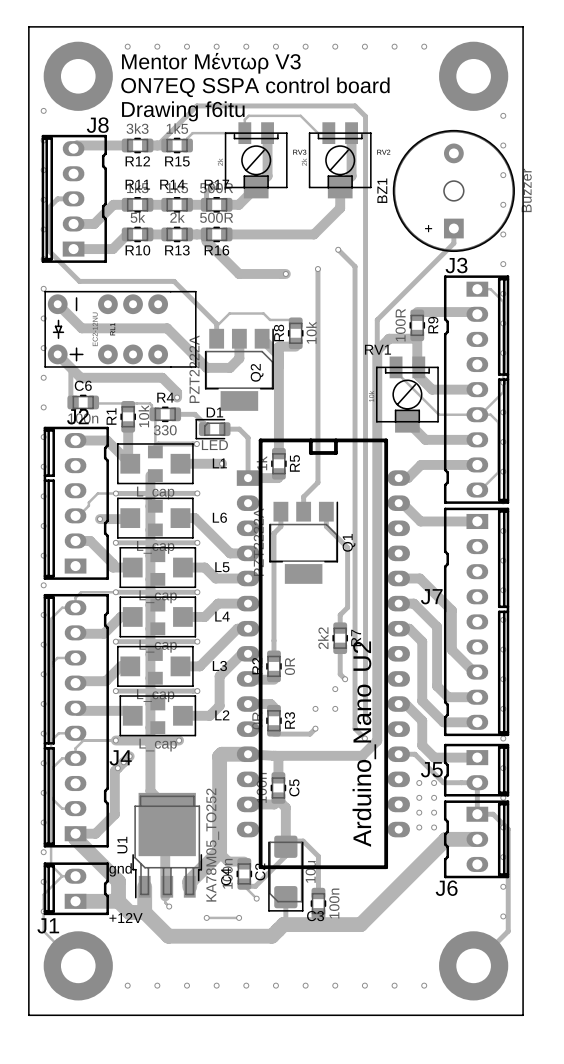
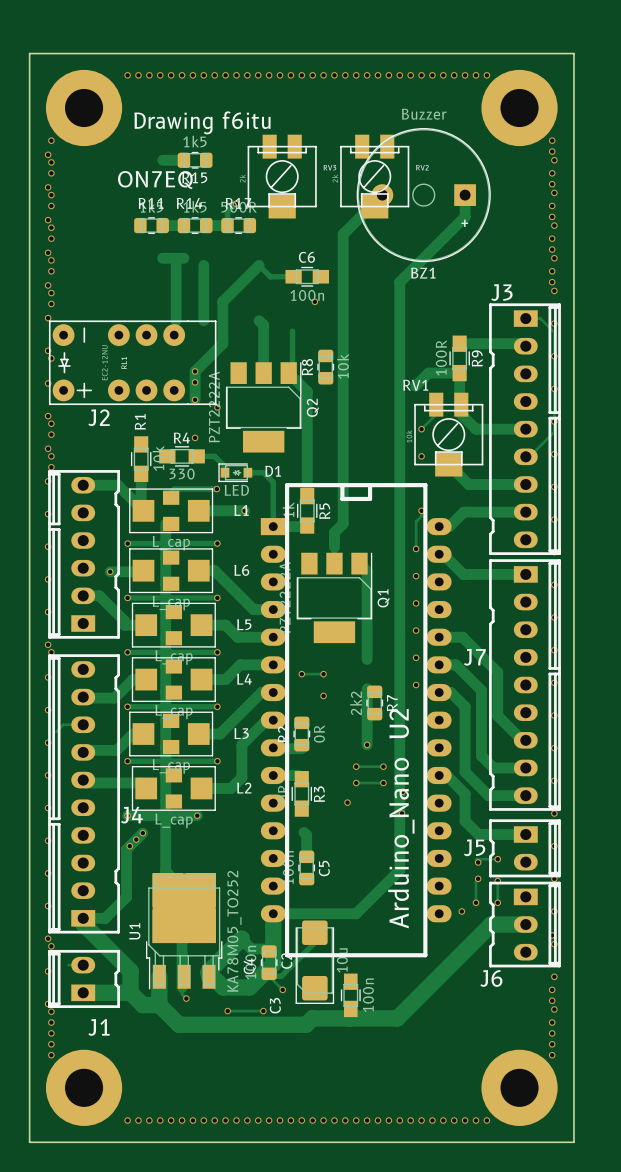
board edge: (28, 26) (28, 1015) (523, 1015) (523, 26) (28, 26) -> (29, 53) (29, 1142) (573, 1142) (573, 53) (29, 53)
via: (127, 46) -> none
via: (157, 46) -> none
via: (187, 46) -> none
via: (216, 46) -> none
via: (246, 46) -> none
via: (275, 46) -> none
via: (305, 46) -> none
via: (335, 46) -> none
via: (364, 46) -> none
via: (394, 46) -> none
via: (424, 46) -> none
text: Mentor Μέντωρ V3 (211, 63) -> none
via: none -> (127, 75)
via: none -> (138, 75)
via: none -> (149, 75)
via: none -> (160, 75)
via: none -> (171, 75)
via: none -> (182, 75)
via: none -> (192, 75)
via: none -> (203, 75)
via: none -> (214, 75)
via: none -> (225, 75)
via: none -> (236, 75)
via: none -> (247, 75)
via: none -> (258, 75)
via: none -> (269, 75)
via: none -> (280, 75)
via: none -> (290, 75)
via: none -> (301, 75)
via: none -> (312, 75)
via: none -> (323, 75)
via: none -> (334, 75)
via: none -> (345, 75)
via: none -> (356, 75)
via: none -> (367, 75)
via: none -> (378, 75)
via: none -> (388, 75)
via: none -> (399, 75)
via: none -> (410, 75)
via: none -> (421, 75)
via: none -> (432, 75)
via: none -> (443, 75)
via: none -> (454, 75)
via: none -> (465, 75)
via: none -> (475, 75)
via: none -> (486, 75)
part position: (78, 76) -> (84, 108)
part position: (473, 76) -> (519, 108)
text: ON7EQ SSPA control board (255, 87) -> none
via position: (43, 110) -> (51, 140)
via: (503, 115) -> none
via: none -> (552, 140)
track: (267, 133) (267, 176) (238, 204) (226, 204) -> none
track: (328, 133) (317, 133) (300, 115) (248, 115) (244, 119) (244, 133) (192, 133) (187, 138) (187, 145) -> none
track: (351, 133) (351, 176) (340, 187) (340, 208) (314, 234) (226, 234) -> none
via: none -> (552, 151)
track: (127, 145) (76, 145) (73, 148) -> none
R12: 3k3 (137, 145) -> none
track: (157, 145) (196, 105) (355, 105) (365, 116) (365, 718) -> none
via: none -> (51, 162)
via: none -> (51, 173)
via: none -> (552, 173)
text: none -> ON7EQ (155, 179)
via: none -> (552, 184)
via: none -> (51, 195)
track: none -> (465, 195) (465, 216) (399, 282) (399, 870) (356, 913) (273, 913)
via: none -> (51, 205)
via: none -> (552, 205)
BZ1 rotation: 0° (453, 190) -> 90° counterclockwise (423, 195)
via: none -> (552, 216)
track: (73, 198) (57, 198) (48, 208) (48, 250) (79, 281) (174, 281) (216, 323) (216, 338) (216, 326) (229, 313) (263, 313) (270, 319) (295, 319) -> none
J8: (74, 198) -> none
track: (127, 204) (113, 204) (94, 223) (73, 223) -> none
via: none -> (51, 227)
via: none -> (51, 238)
via: none -> (552, 238)
via: none -> (552, 249)
track: (453, 228) (453, 243) (377, 319) (377, 740) (362, 755) (221, 754) (219, 756) (219, 852) -> none
track: (127, 234) (112, 249) (73, 249) -> none
R10: 5k (137, 234) -> none
R13: 2k (177, 234) -> none
track: (187, 234) (206, 234) (206, 241) (239, 273) (285, 273) -> none
R16: 500R (216, 234) -> none
via: none -> (51, 260)
track: none -> (176, 265) (176, 320)
track: none -> (203, 265) (203, 320)
via: none -> (51, 271)
via: none -> (552, 271)
track: (338, 249) (355, 266) (355, 728) (364, 738) -> none
via: (338, 249) -> none
track: none -> (293, 276) (270, 276) (259, 265) (222, 301) (222, 343) (195, 371) (195, 399)
via: none -> (552, 282)
via: none -> (51, 293)
track: (317, 269) (317, 482) (303, 496) -> (382, 195) (343, 234) (343, 523) (334, 532) (334, 547)
via: (317, 269) -> none
via: none -> (51, 303)
track: none -> (292, 331) (292, 369) (288, 373)
track: (57, 304) (81, 328) (167, 328) (206, 367) (230, 367) (239, 358) (239, 338) -> (259, 320) (263, 325) (263, 373)
R9 footprint: [409, 309, 425, 342] -> [449, 335, 470, 382]
via: none -> (51, 358)
via: none -> (195, 371)
track: (295, 346) (279, 346) (278, 355) -> none
via: none -> (195, 382)
via: none -> (195, 399)
via: none -> (217, 407)
track: (396, 371) (438, 414) (490, 414) (498, 422) (498, 472) (480, 490) (477, 490) -> none
Q2 name position: Q2 (257, 372) -> Q2 (312, 407)
track: none -> (436, 414) (421, 429)
via: none -> (51, 423)
via: none -> (421, 429)
via: none -> (51, 434)
C6 footprint: [67, 394, 100, 411] -> [285, 266, 330, 287]
track: (177, 397) (177, 392) (162, 377) (80, 377) (57, 354) (57, 354) (70, 367) (70, 402) -> none
R1 footprint: [120, 400, 136, 433] -> [130, 436, 152, 482]
track: (95, 402) (149, 403) (151, 405) (151, 414) (155, 417) (155, 451) -> none
R4 footprint: [149, 406, 182, 422] -> [159, 446, 205, 467]
D1 name position: D1 (214, 412) -> D1 (273, 471)
via: none -> (51, 456)
via: none -> (421, 456)
J2 name position: J2 (77, 416) -> J2 (99, 417)
R1 name position: R1 (111, 416) -> R1 (140, 421)
D1 footprint: [195, 419, 231, 440] -> [218, 463, 253, 483]
via: none -> (51, 467)
R5 footprint: [271, 447, 287, 480] -> [297, 487, 318, 534]
track: none -> (421, 510) (421, 516) (416, 521) (416, 548)
via: none -> (421, 510)
track: (115, 493) (97, 493) (88, 502) (88, 505) (78, 515) (75, 515) -> none
via: none -> (416, 548)
track: (280, 511) (280, 526) (273, 533) (273, 653) -> none
track: (326, 511) (326, 526) (347, 547) (347, 607) (340, 614) (340, 624) -> (359, 563) (367, 571) (367, 659)
via: none -> (416, 576)
via: none -> (416, 603)
via: none -> (416, 630)
via: none -> (51, 652)
track: (115, 592) (81, 592) (75, 597) (75, 607) (62, 607) (51, 618) (51, 865) (62, 876) (43, 894) (43, 931) (78, 965) -> none
via: none -> (416, 657)
track: none -> (301, 674) (323, 674)
via: none -> (301, 674)
via: none -> (323, 674)
via: none -> (416, 685)
track: none -> (367, 688) (367, 744)
via: none -> (323, 695)
track: (340, 651) (340, 674) (345, 679) -> none
via: none -> (367, 744)
via: (345, 679) -> none
via: (335, 689) -> none
track: none -> (356, 766) (383, 766)
via: none -> (356, 766)
via: none -> (383, 766)
R3 footprint: [266, 704, 282, 737] -> [291, 771, 313, 817]
via: (315, 708) -> none
via: (335, 708) -> none
track: none -> (356, 783) (383, 783)
via: none -> (356, 783)
via: none -> (383, 783)
track: (315, 728) (310, 734) (273, 734) -> none
track: (83, 740) (75, 748) (75, 758) (62, 758) (51, 769) -> none
track: (115, 740) (82, 740) (75, 733) (58, 733) (51, 741) -> none
track: (398, 754) (414, 754) (443, 782) (477, 782) (477, 814) (493, 814) (508, 829) (508, 931) (473, 965) -> none
J4 name position: J4 (120, 757) -> J4 (131, 815)
track: none -> (475, 859) (497, 859)
via: none -> (497, 859)
via: (419, 783) -> none
U1 footprint: [132, 792, 202, 899] -> [145, 873, 223, 990]
track: (51, 797) (62, 808) (75, 808) -> none
via: (419, 797) -> none
track: none -> (475, 880) (475, 902)
track: none -> (497, 880) (497, 902)
via: none -> (497, 880)
track: (248, 804) (274, 804) (278, 800) (285, 807) (285, 841) (303, 841) (318, 856) (318, 891) -> none
via: (419, 812) -> none
via: (434, 812) -> none
via: none -> (475, 902)
via: none -> (497, 902)
via: (434, 827) -> none
track: none -> (273, 913) (273, 963) (249, 987) (223, 987) (208, 972)
via: none -> (552, 935)
via: none -> (51, 946)
text: gnd (120, 869) -> none
C3 footprint: [310, 887, 327, 920] -> [340, 973, 361, 1018]
via: none -> (552, 989)
track: (285, 902) (285, 926) (272, 936) (168, 936) (162, 930) -> (306, 1024) (178, 1024)
via: none -> (552, 1000)
C3 name rotation: 0° (315, 916) -> 90° counterclockwise (275, 1005)
C3 name position: C3 (315, 916) -> C3 (275, 1005)
text: +12V (126, 917) -> none
via: none -> (51, 1011)
J1 name position: J1 (48, 925) -> J1 (99, 1027)
via: none -> (51, 1022)
via: none -> (552, 1022)
via: none -> (51, 1033)
via: none -> (552, 1033)
via: none -> (51, 1044)
via: none -> (552, 1044)
via: none -> (51, 1055)
via: none -> (552, 1055)
part position: (78, 965) -> (84, 1087)
part position: (473, 965) -> (519, 1087)
via: (127, 985) -> none
via: (157, 985) -> none
via: (187, 985) -> none
via: (216, 985) -> none
via: (246, 985) -> none
via: (275, 985) -> none
via: (305, 985) -> none
via: (335, 985) -> none
via: (364, 985) -> none
via: (394, 985) -> none
via: (424, 985) -> none
via: none -> (127, 1120)
via: none -> (138, 1120)
via: none -> (149, 1120)
via: none -> (160, 1120)
via: none -> (171, 1120)
via: none -> (182, 1120)
via: none -> (192, 1120)
via: none -> (203, 1120)
via: none -> (214, 1120)
via: none -> (225, 1120)
via: none -> (236, 1120)
via: none -> (247, 1120)
via: none -> (258, 1120)
via: none -> (269, 1120)
via: none -> (280, 1120)
via: none -> (290, 1120)
via: none -> (301, 1120)
via: none -> (312, 1120)
via: none -> (323, 1120)
via: none -> (334, 1120)
via: none -> (345, 1120)
via: none -> (356, 1120)
via: none -> (367, 1120)
via: none -> (378, 1120)
via: none -> (388, 1120)
via: none -> (399, 1120)
via: none -> (410, 1120)
via: none -> (421, 1120)
via: none -> (432, 1120)
via: none -> (443, 1120)
via: none -> (454, 1120)
via: none -> (465, 1120)
via: none -> (475, 1120)
via: none -> (486, 1120)

